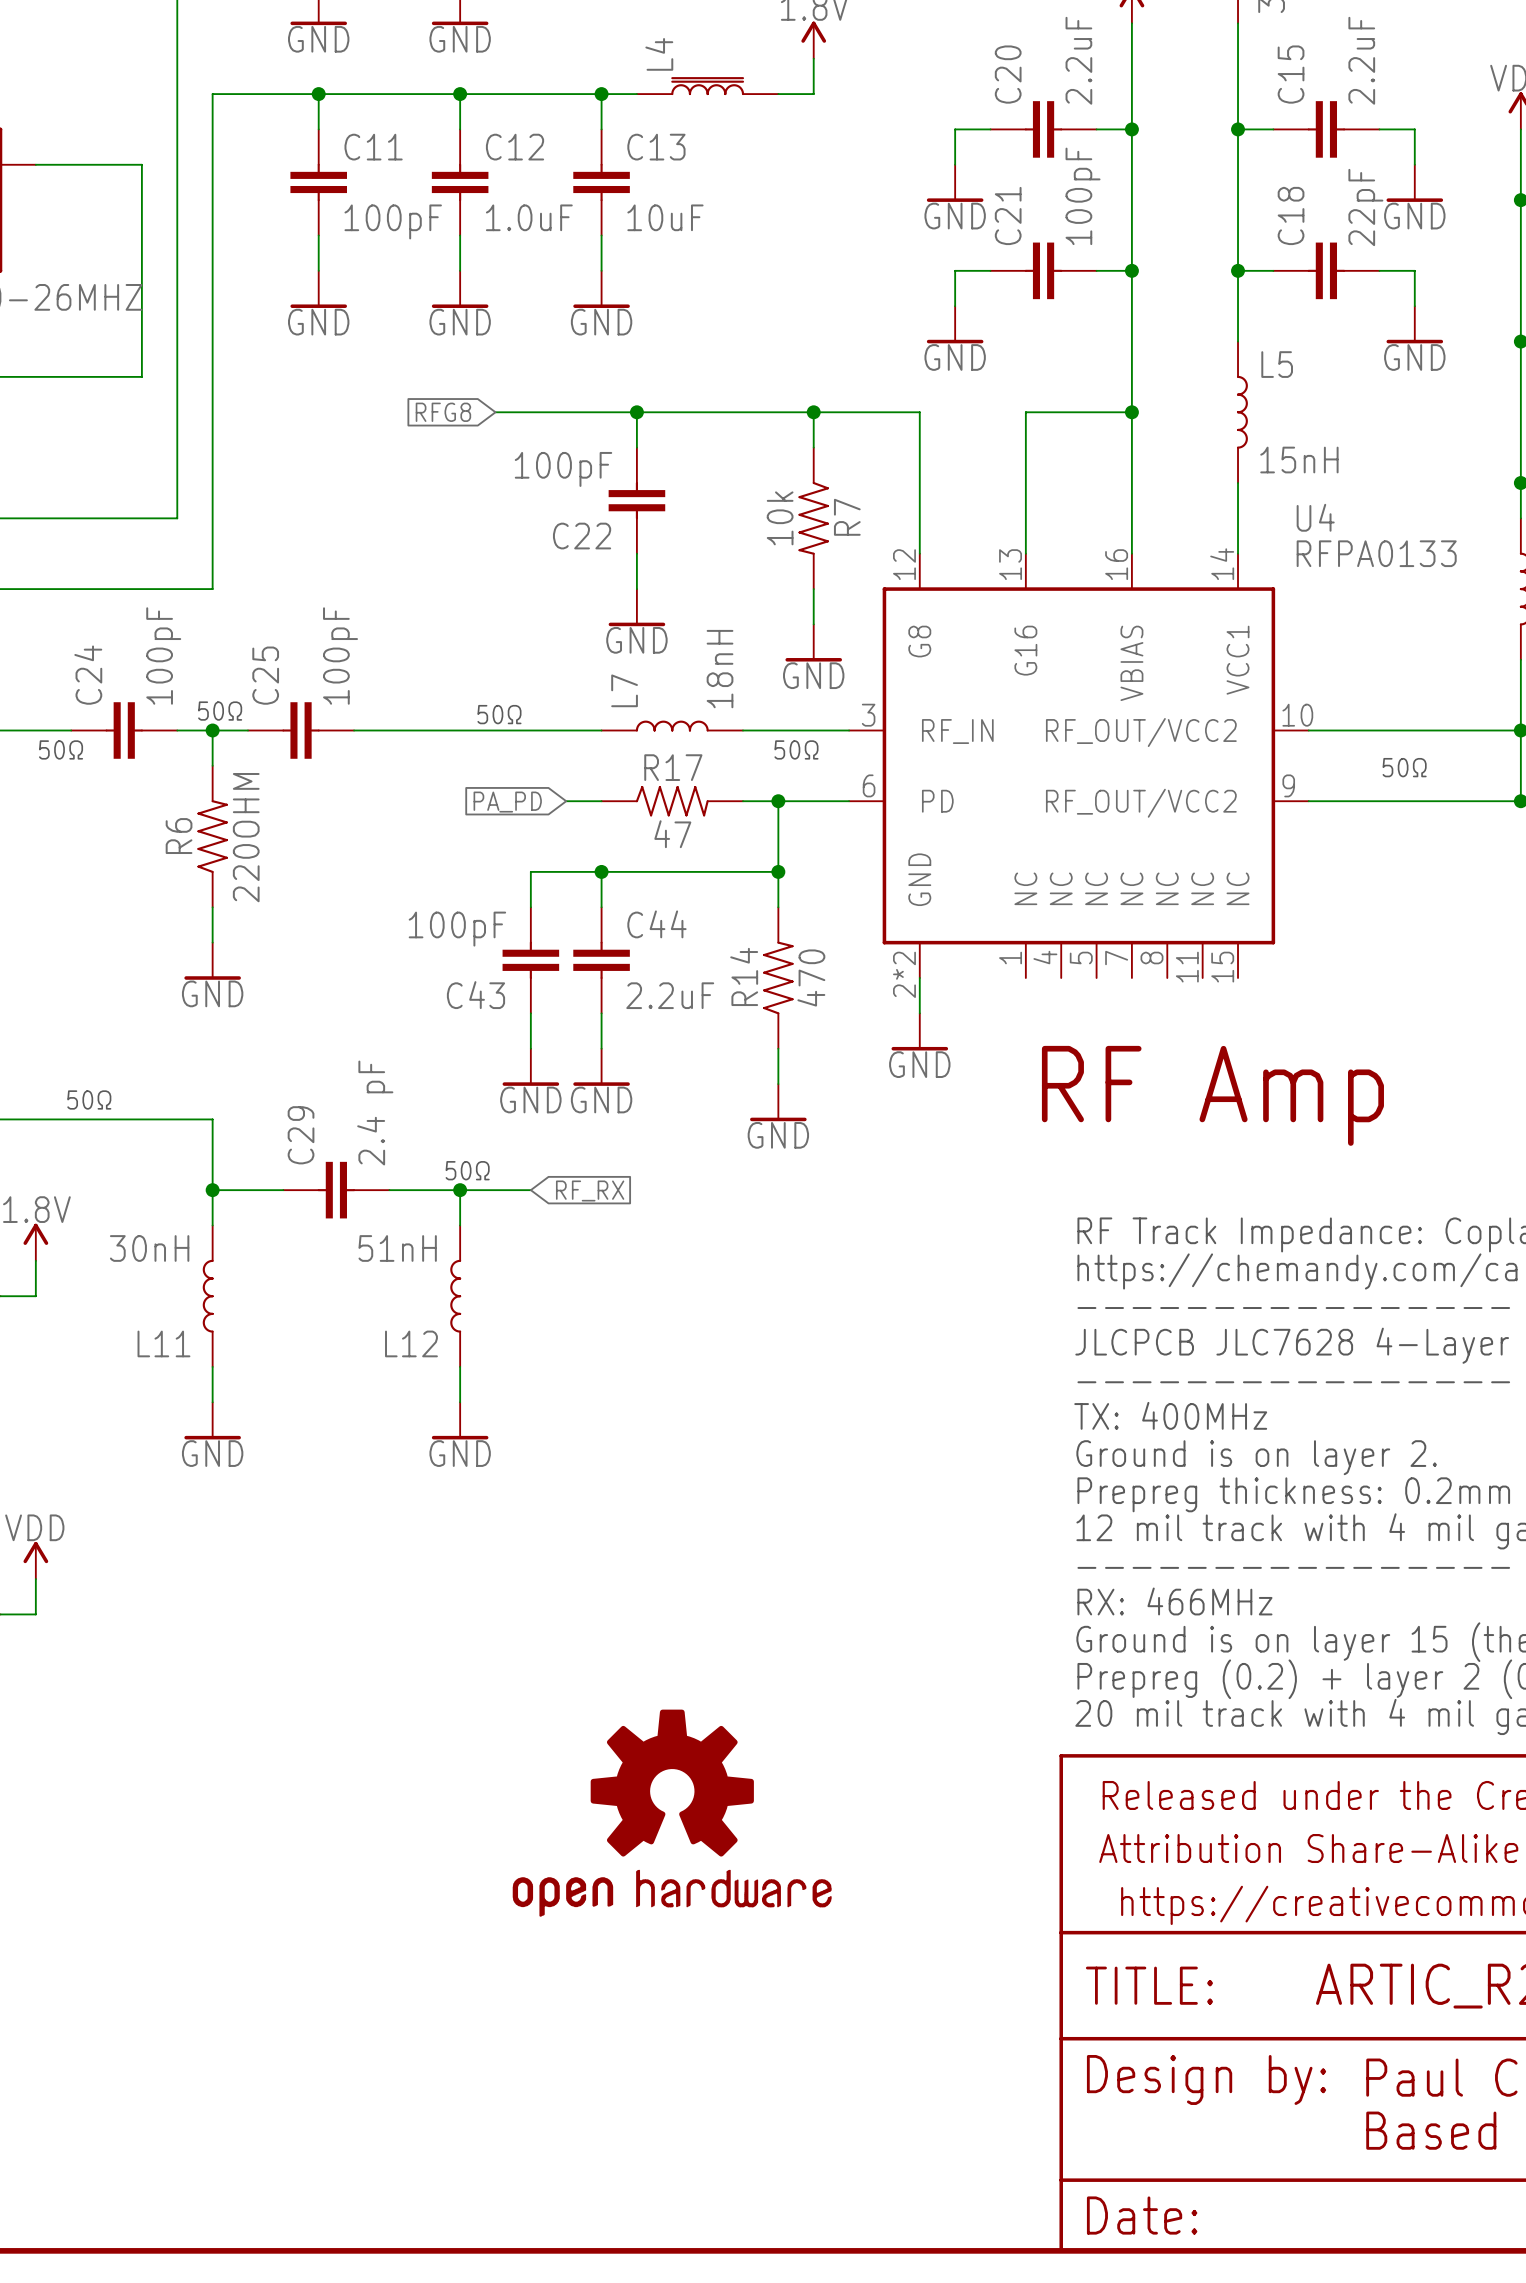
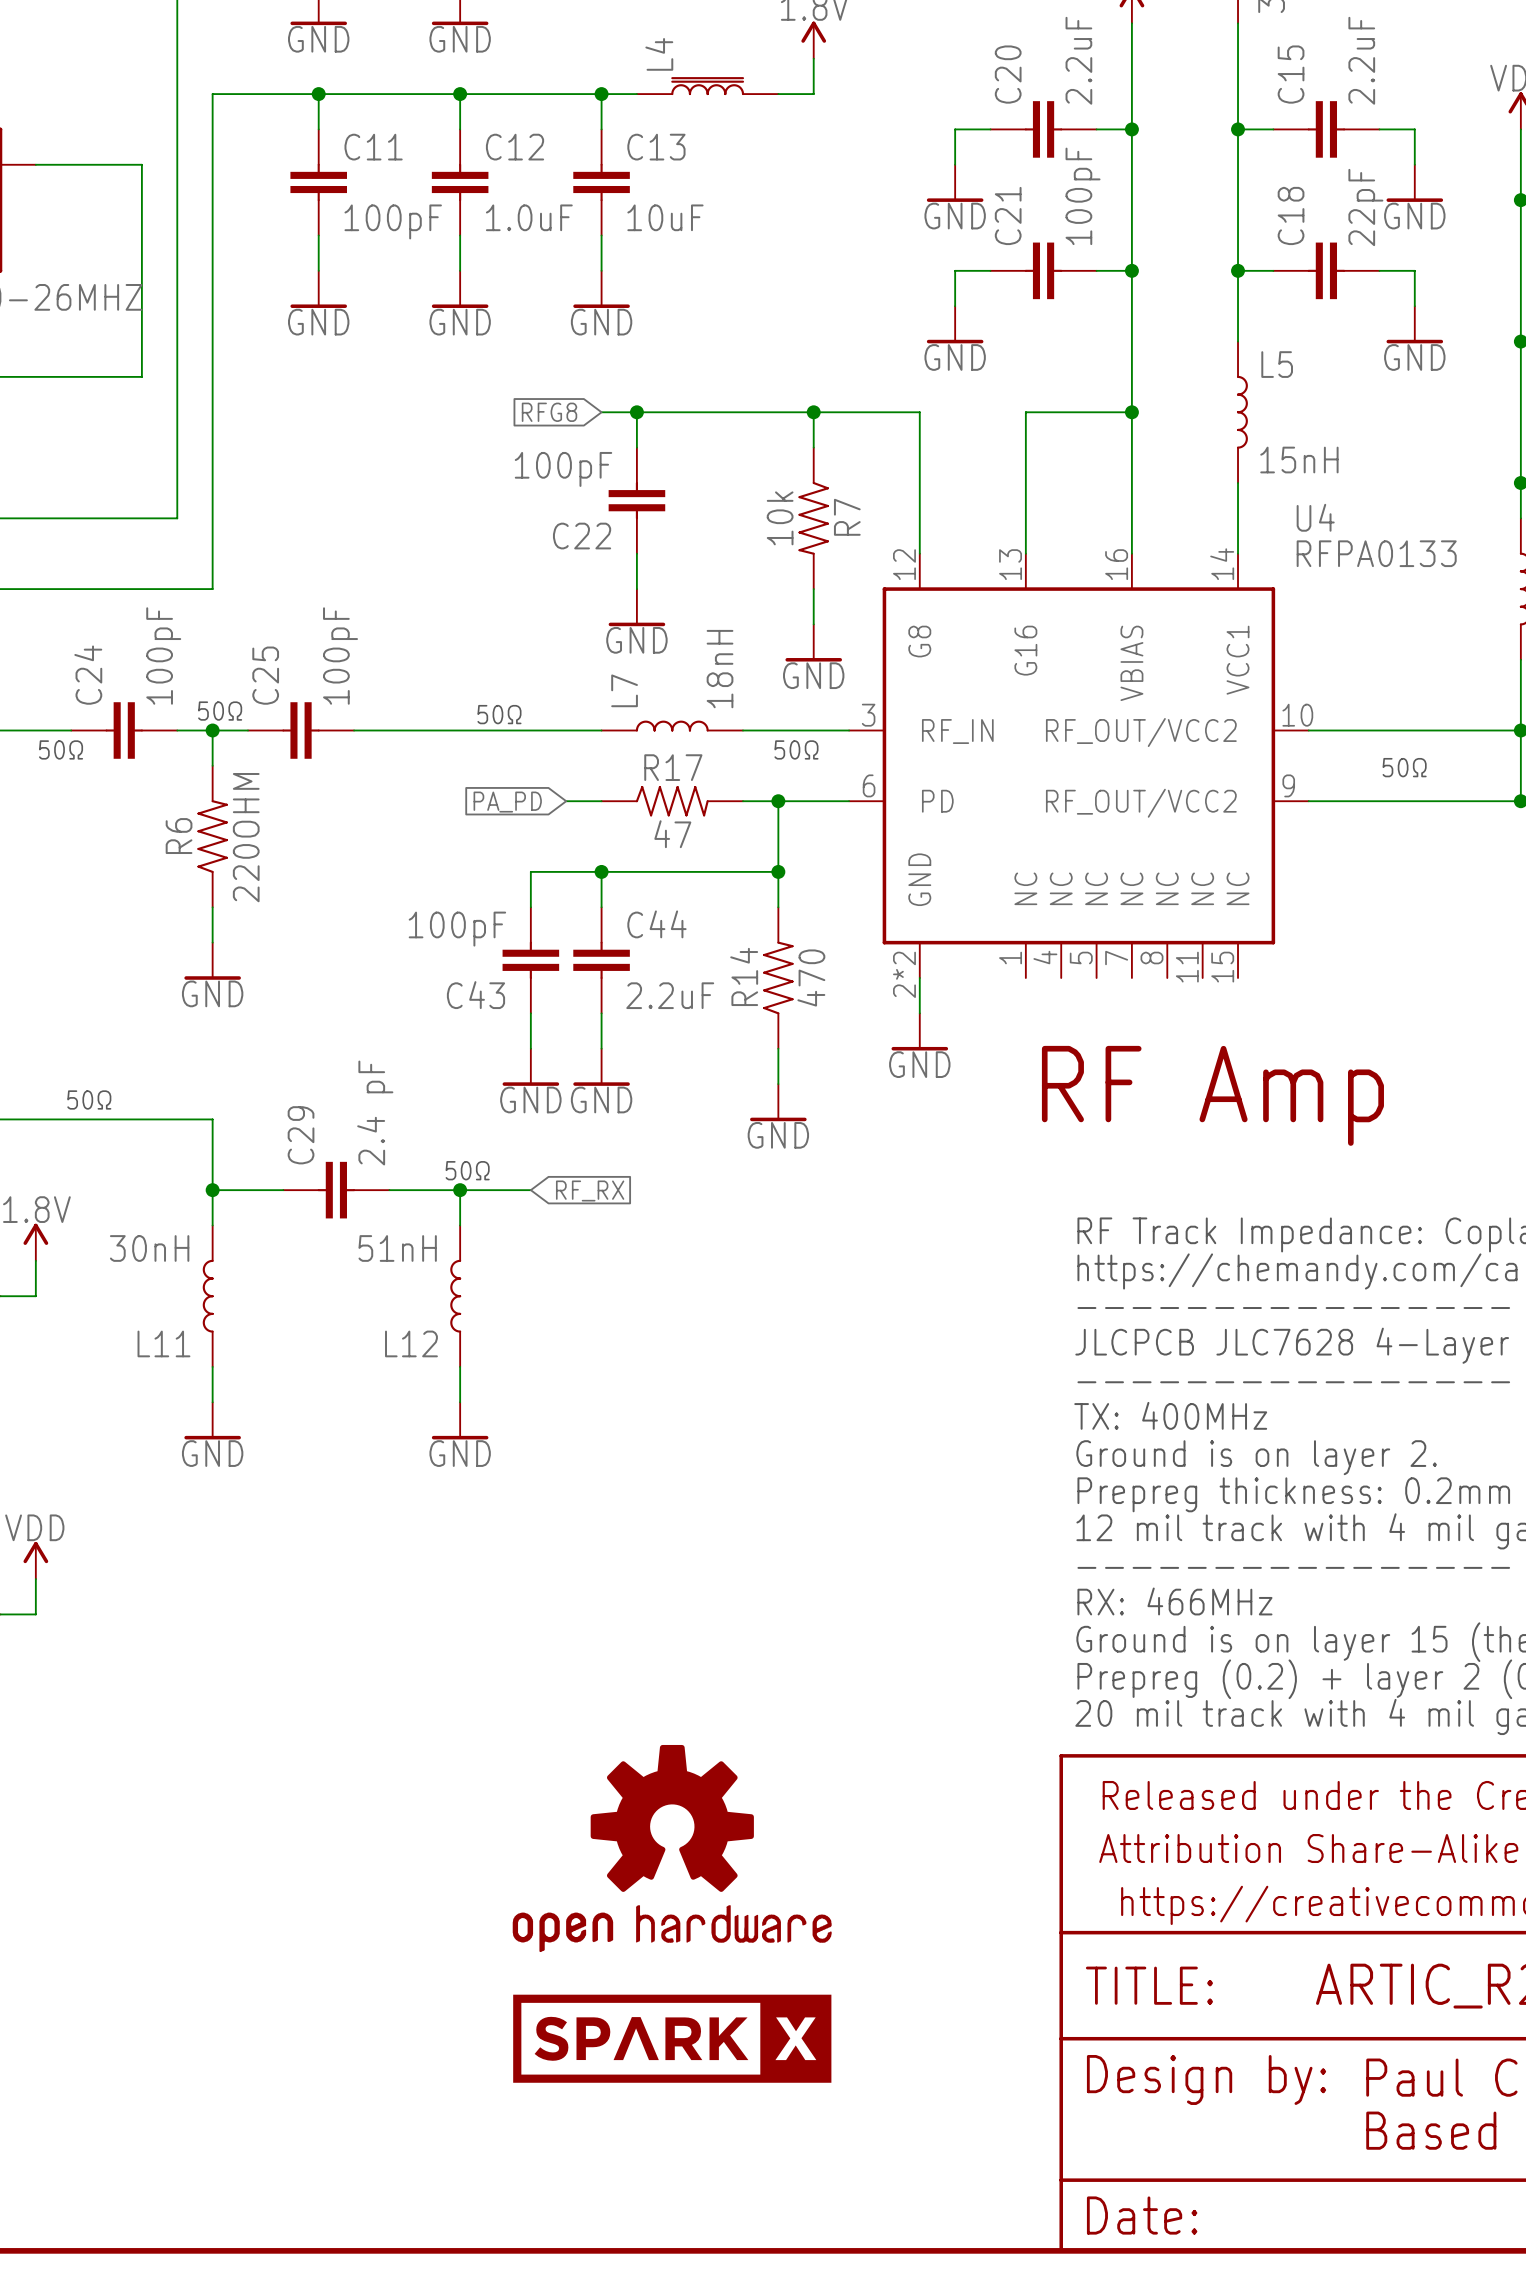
global label position: RFG8 (443, 412) -> RFG8 (549, 412)
wire: (495, 412) (601, 412) -> none
part position: (672, 1813) -> (672, 1848)
part: none -> (672, 2038)

